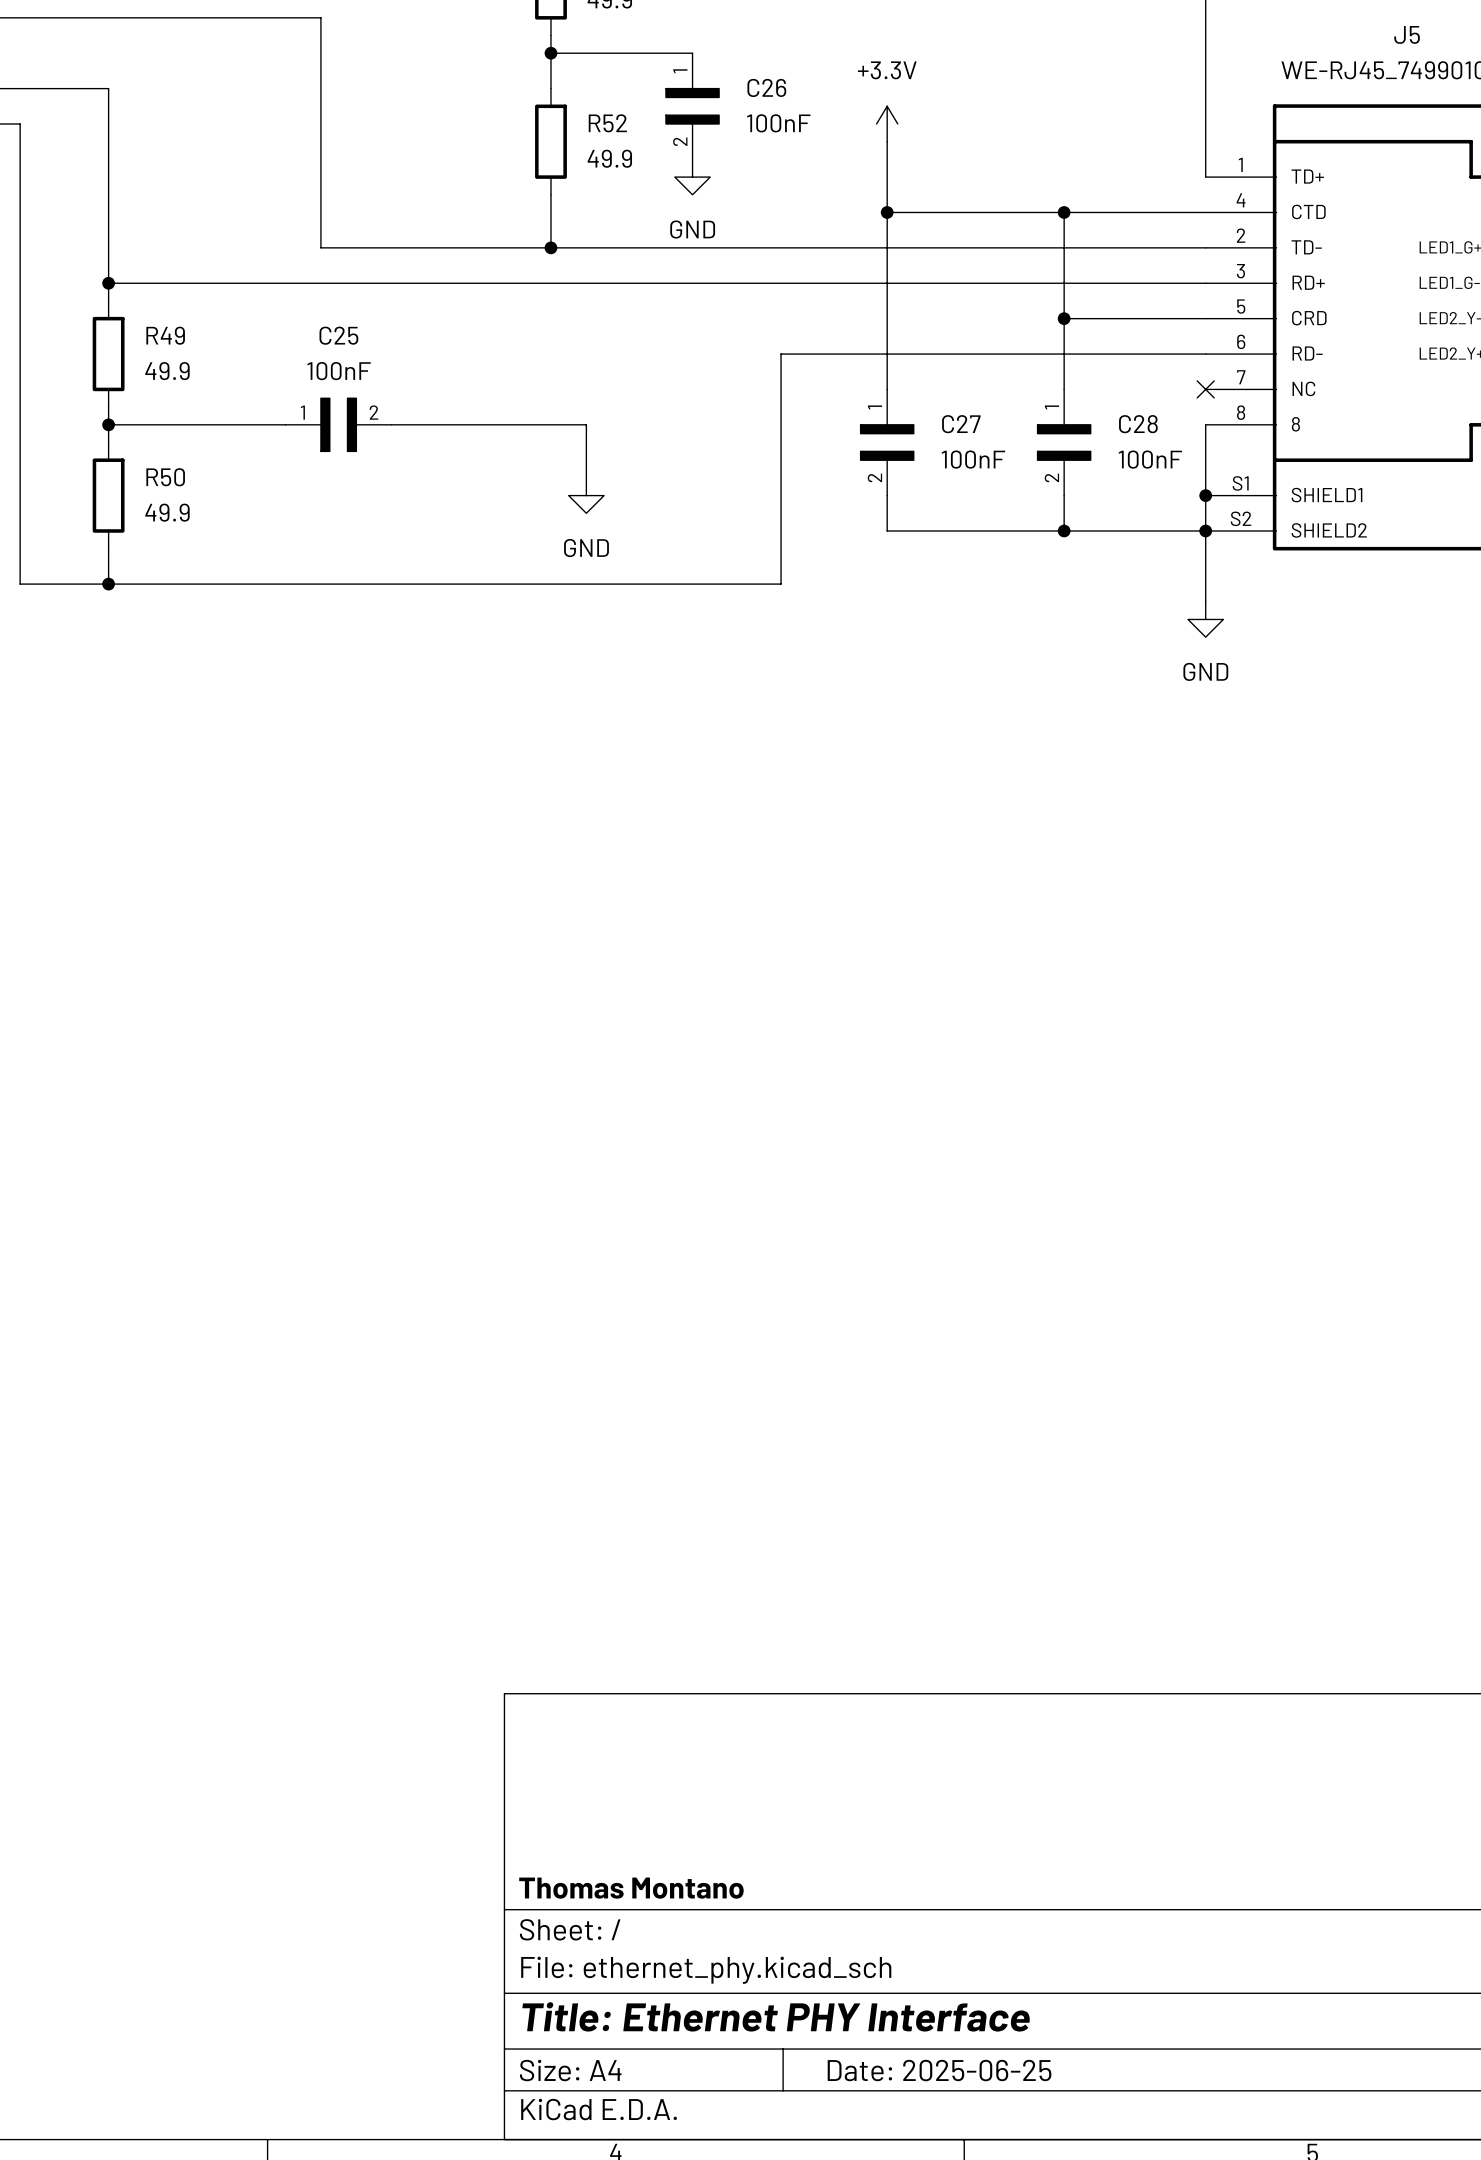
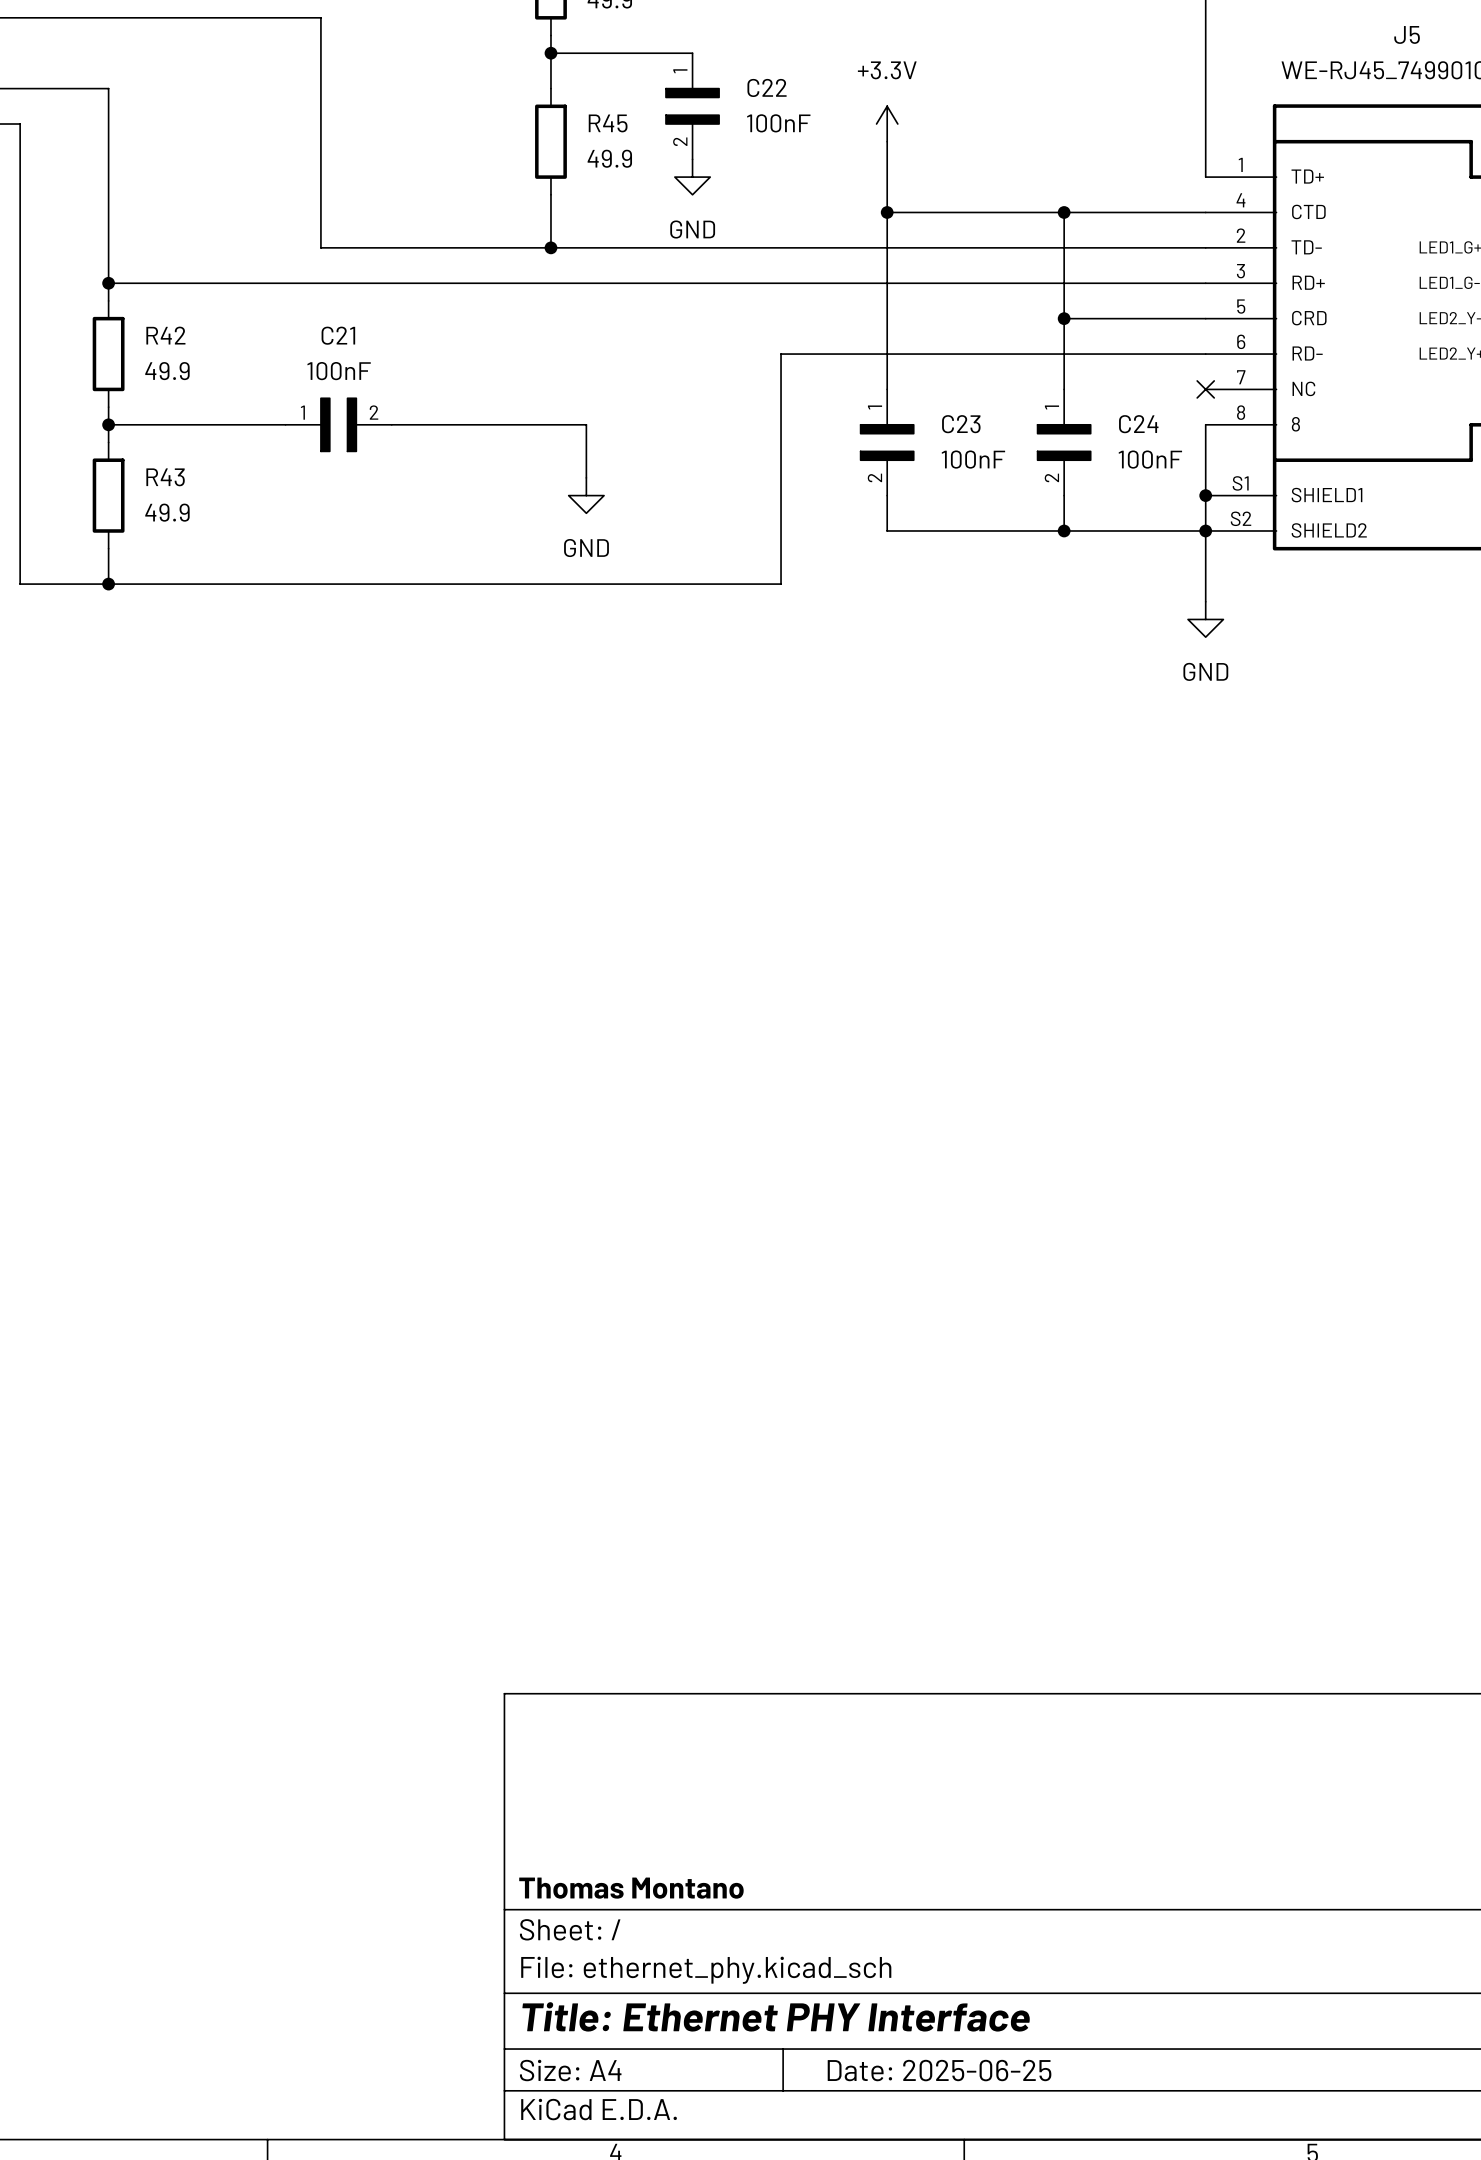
C26 name: C26 (766, 87) -> C22 (767, 87)
R52 name: R52 (607, 123) -> R45 (608, 123)
R49 name: R49 (165, 335) -> R42 (165, 335)
C25 name: C25 (338, 335) -> C21 (338, 335)
C27 name: C27 (961, 424) -> C23 (961, 424)
C28 name: C28 (1138, 424) -> C24 (1138, 424)
R50 name: R50 (165, 477) -> R43 (165, 477)

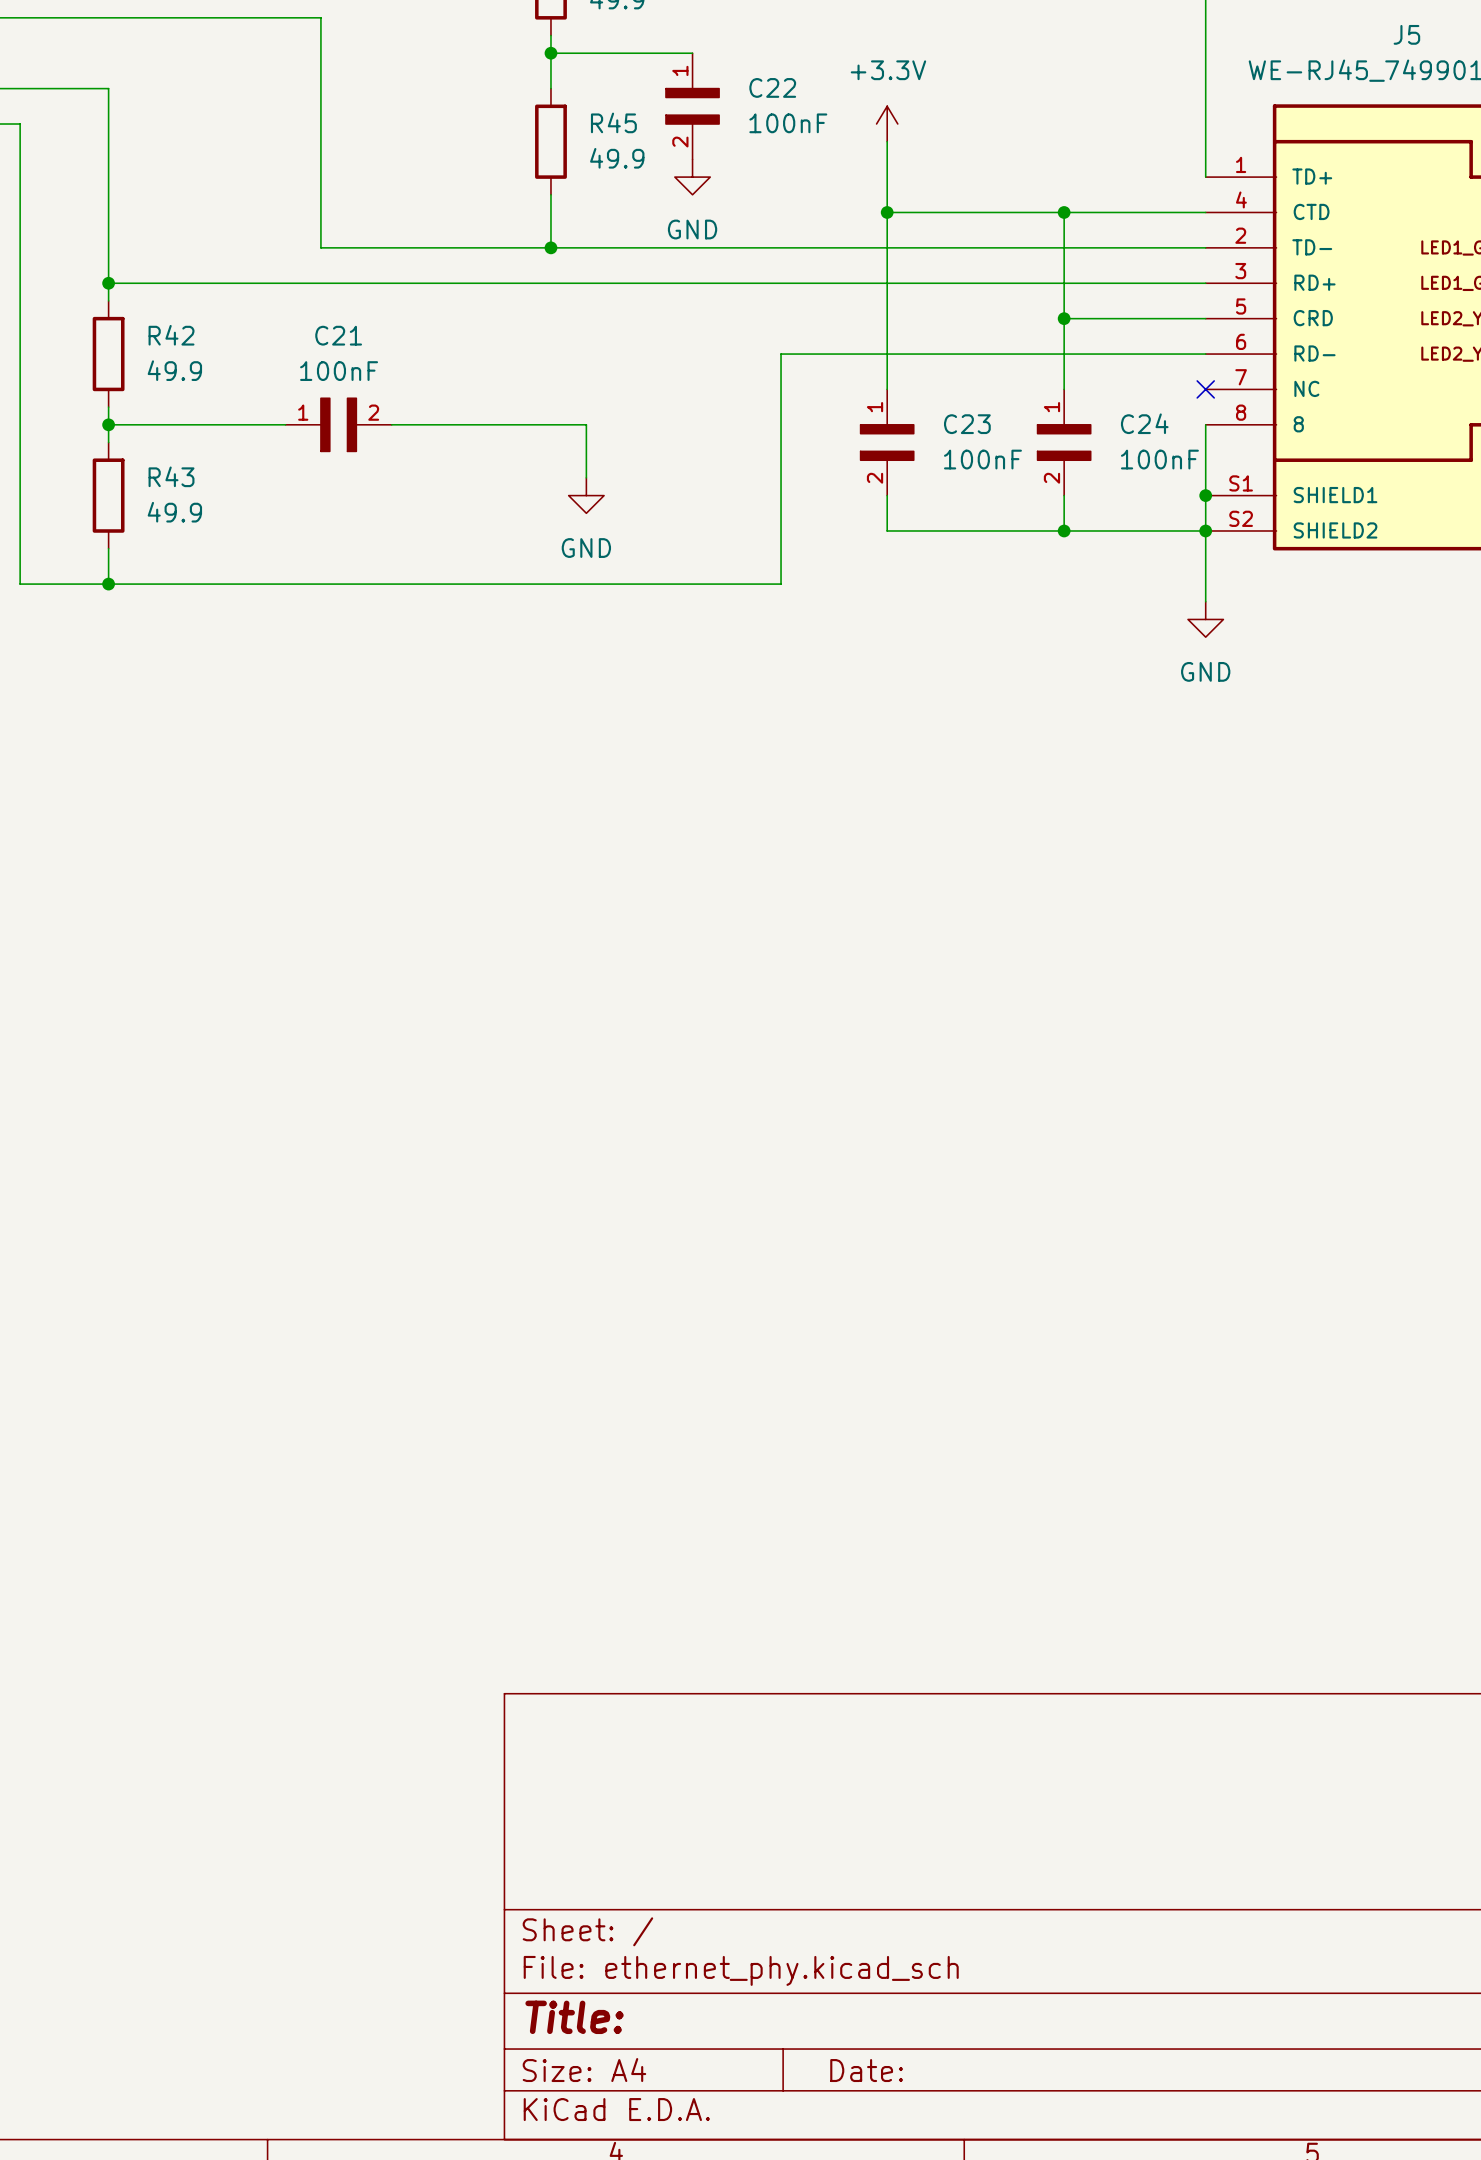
title block: Thomas Montano (631, 1888) -> none
title block: Title: Ethernet PHY Interface (776, 2016) -> Title: (574, 2017)
title block: Date: 2025-06-25 (939, 2070) -> Date: (866, 2070)

